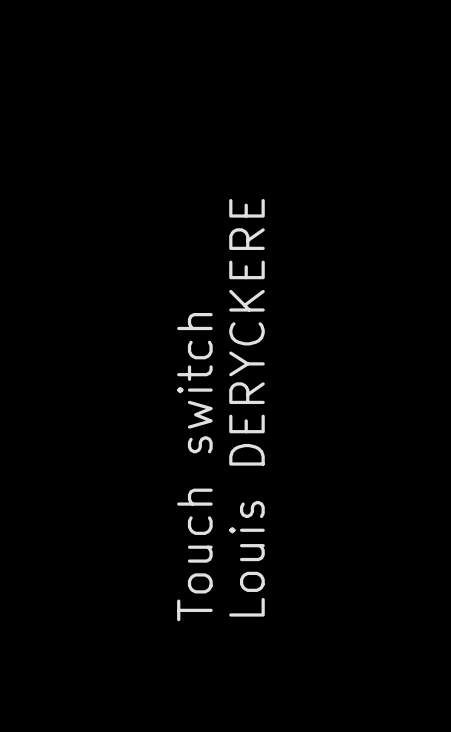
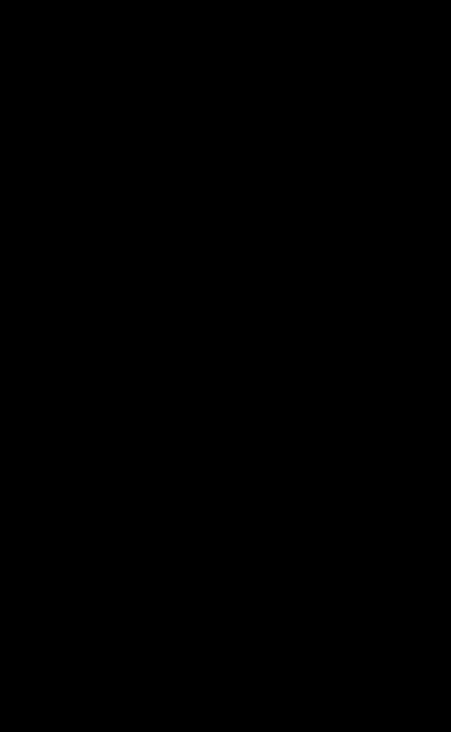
text: Louis DERYCKERE (246, 407) -> none
text: Touch switch (194, 467) -> none

